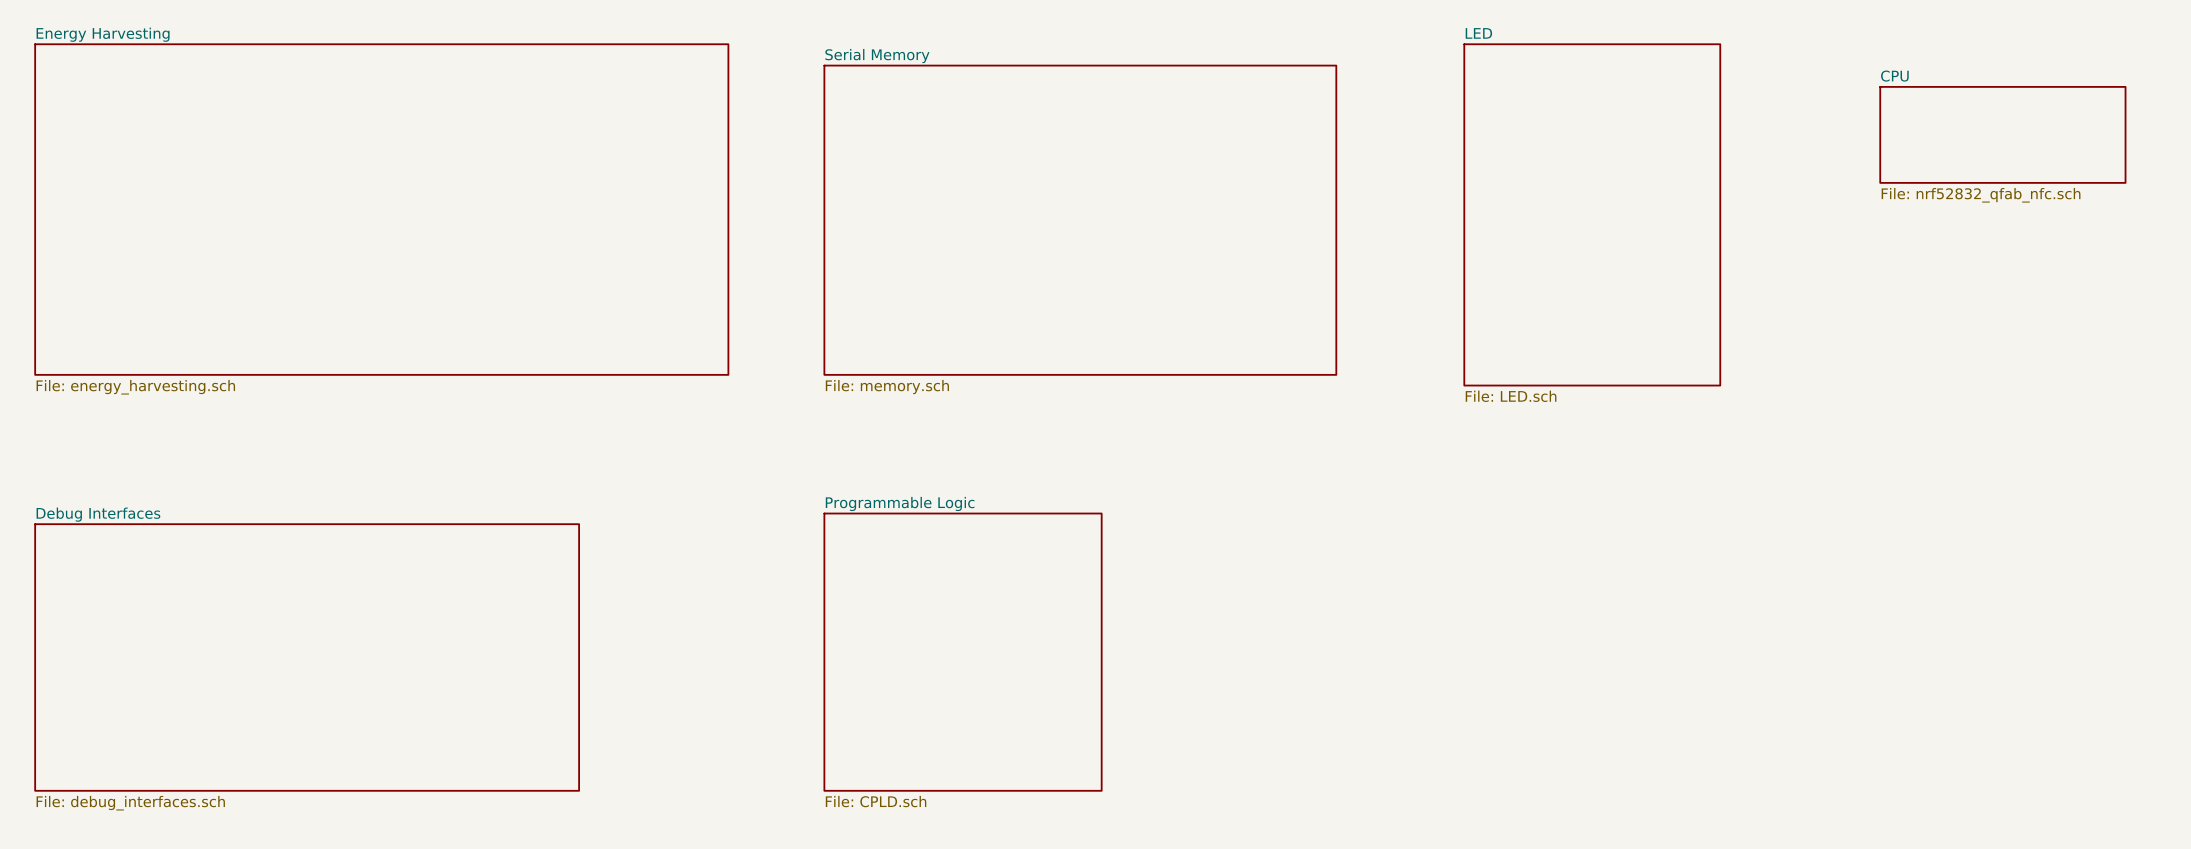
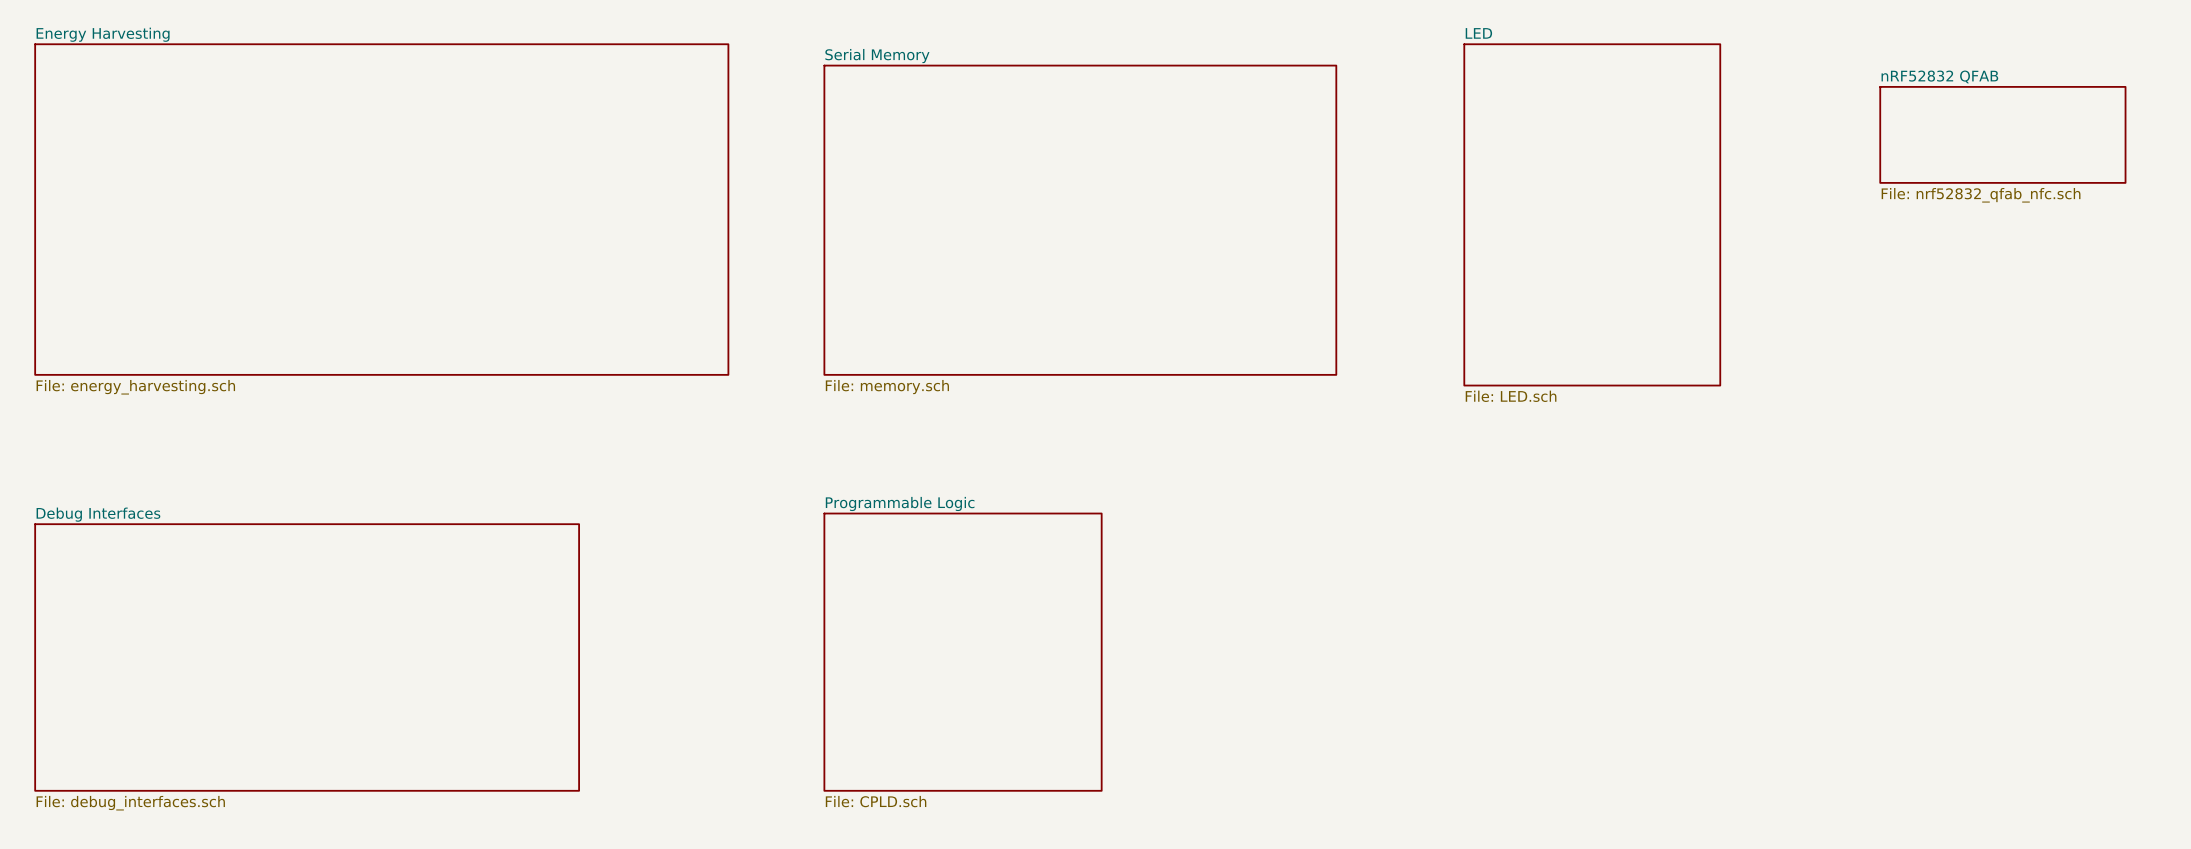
sheet CPU name: CPU (1894, 76) -> nRF52832 QFAB (1939, 76)

